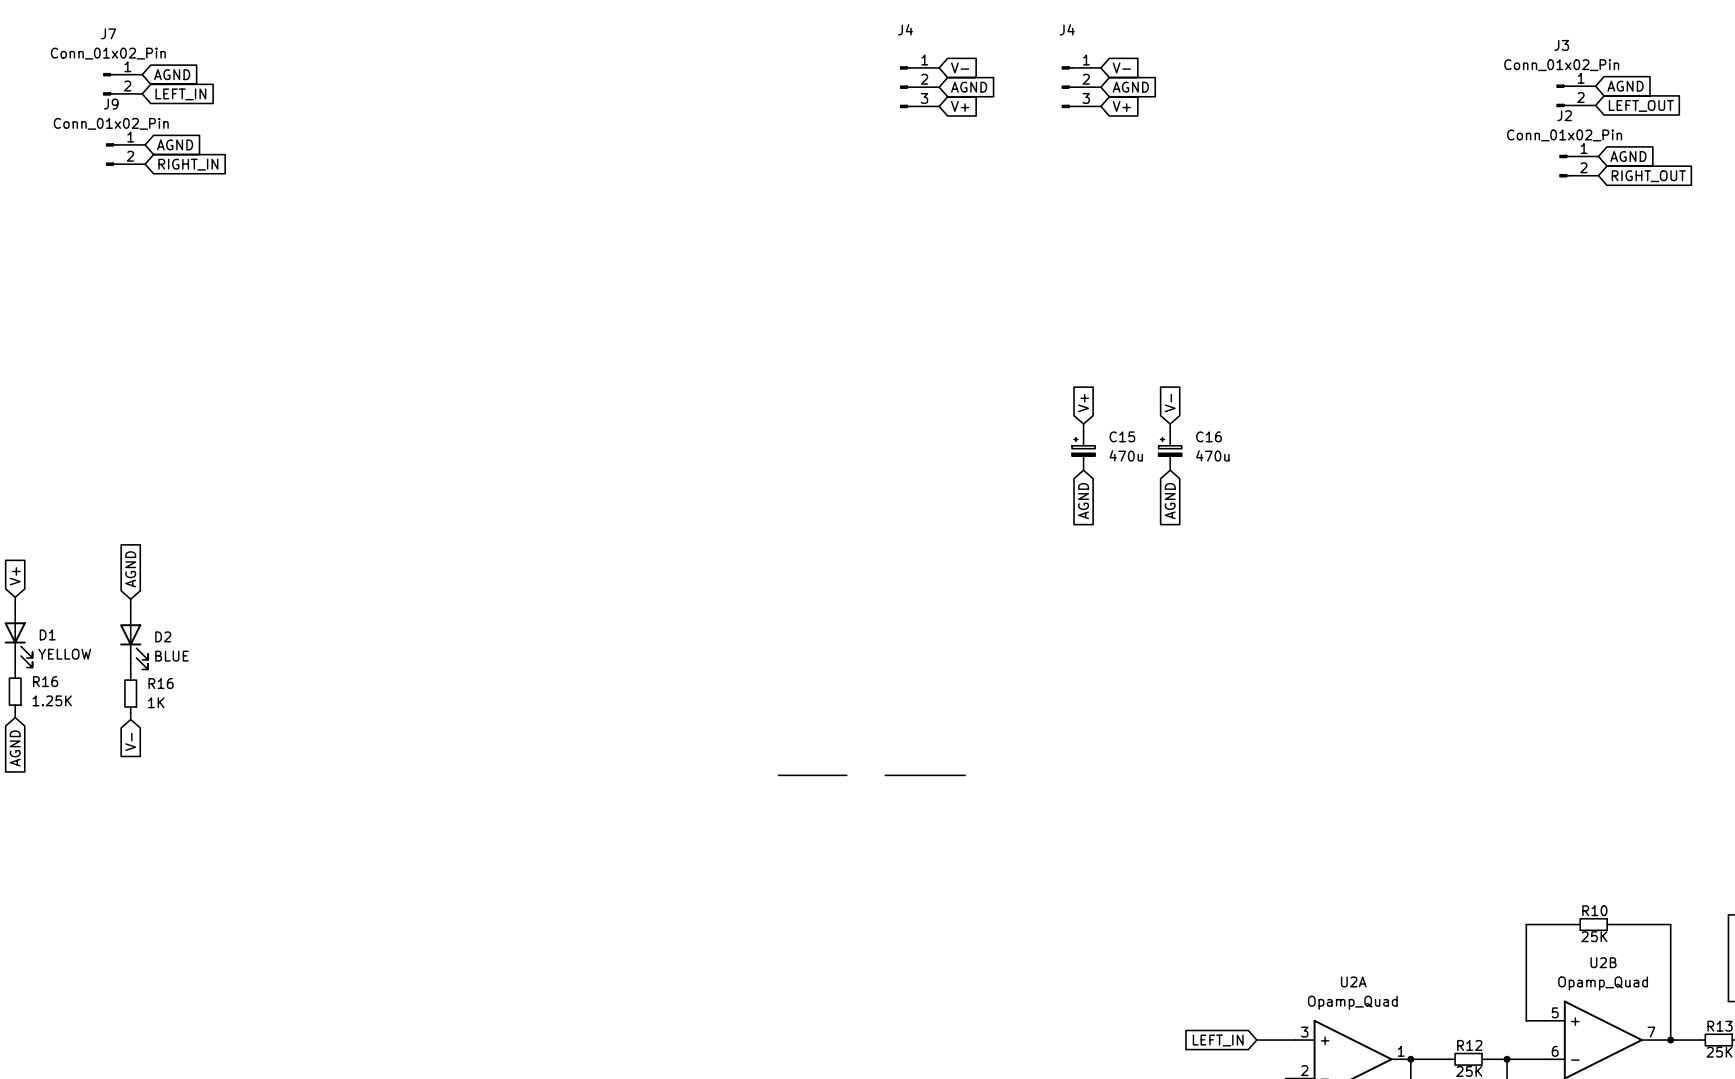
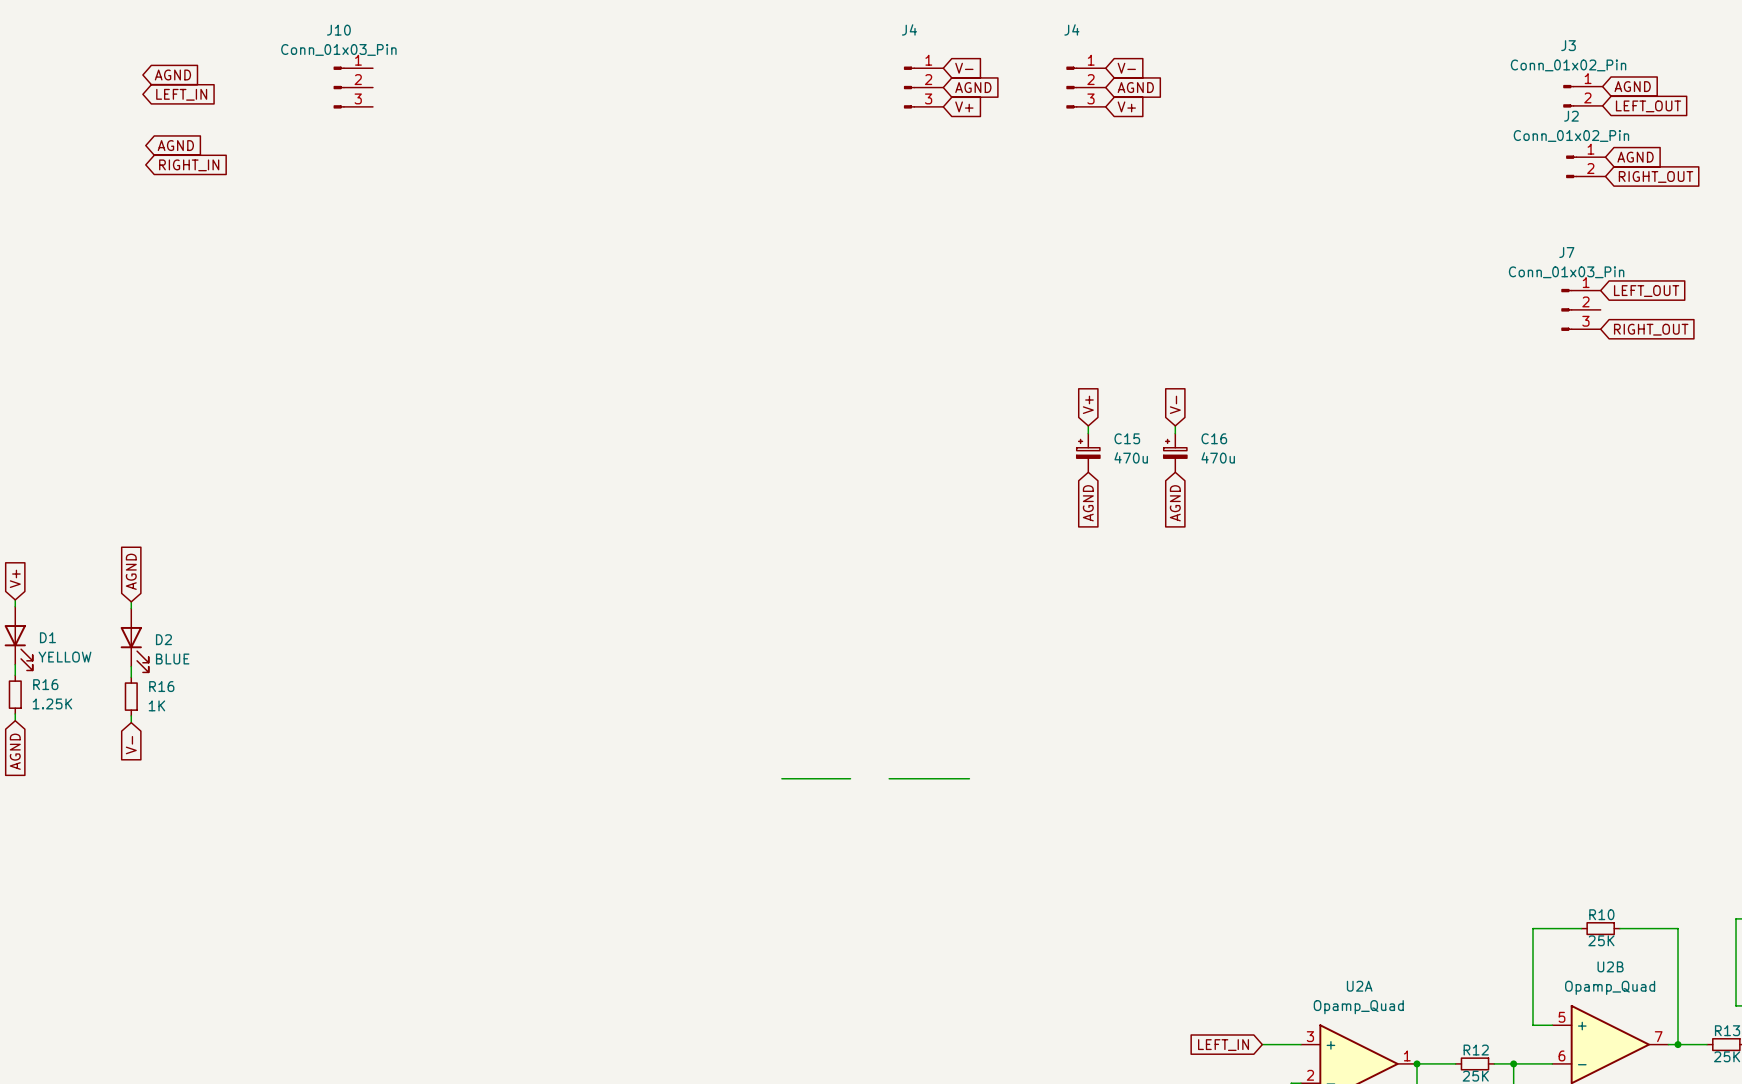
J7 value: Conn_01x02_Pin (108, 53) -> Conn_01x03_Pin (1566, 272)
J7 symbol: [103, 73, 143, 96] -> [1561, 289, 1601, 331]
J10: none -> Conn_01x03_Pin (353, 87)
J9: Conn_01x02_Pin (125, 154) -> none
global label: none -> LEFT_OUT (1646, 291)
global label: none -> RIGHT_OUT (1651, 329)

